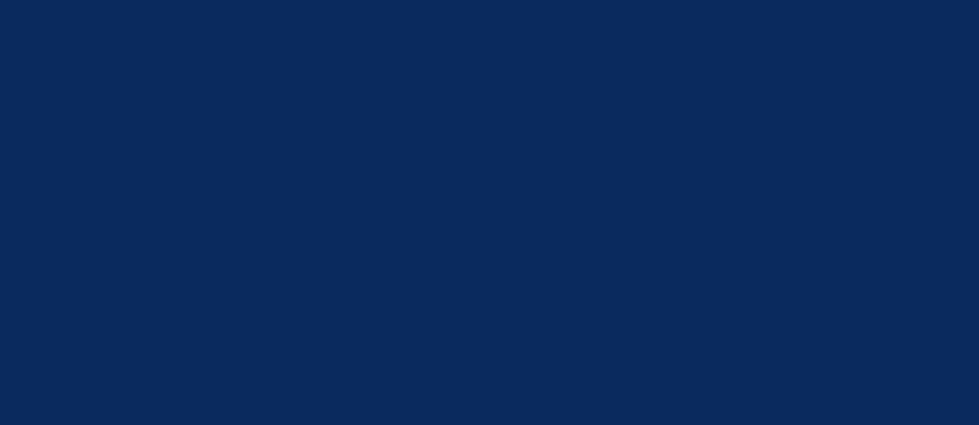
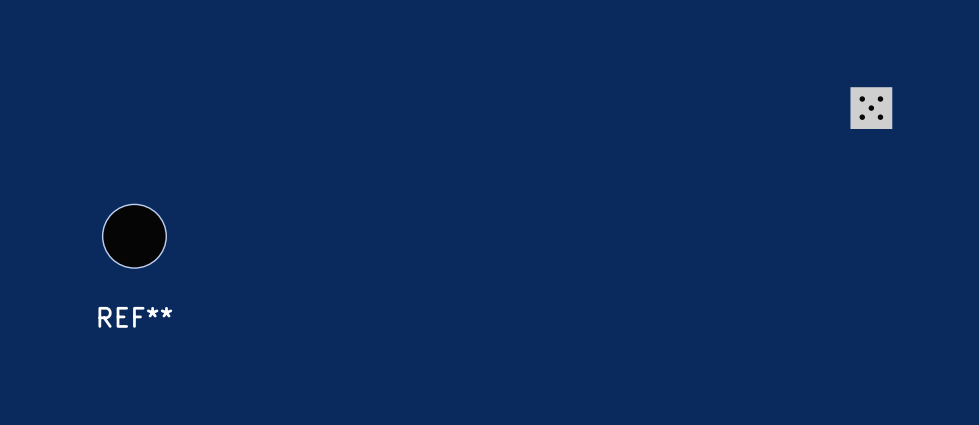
part: none -> (871, 108)
REF**: none -> (134, 236)

